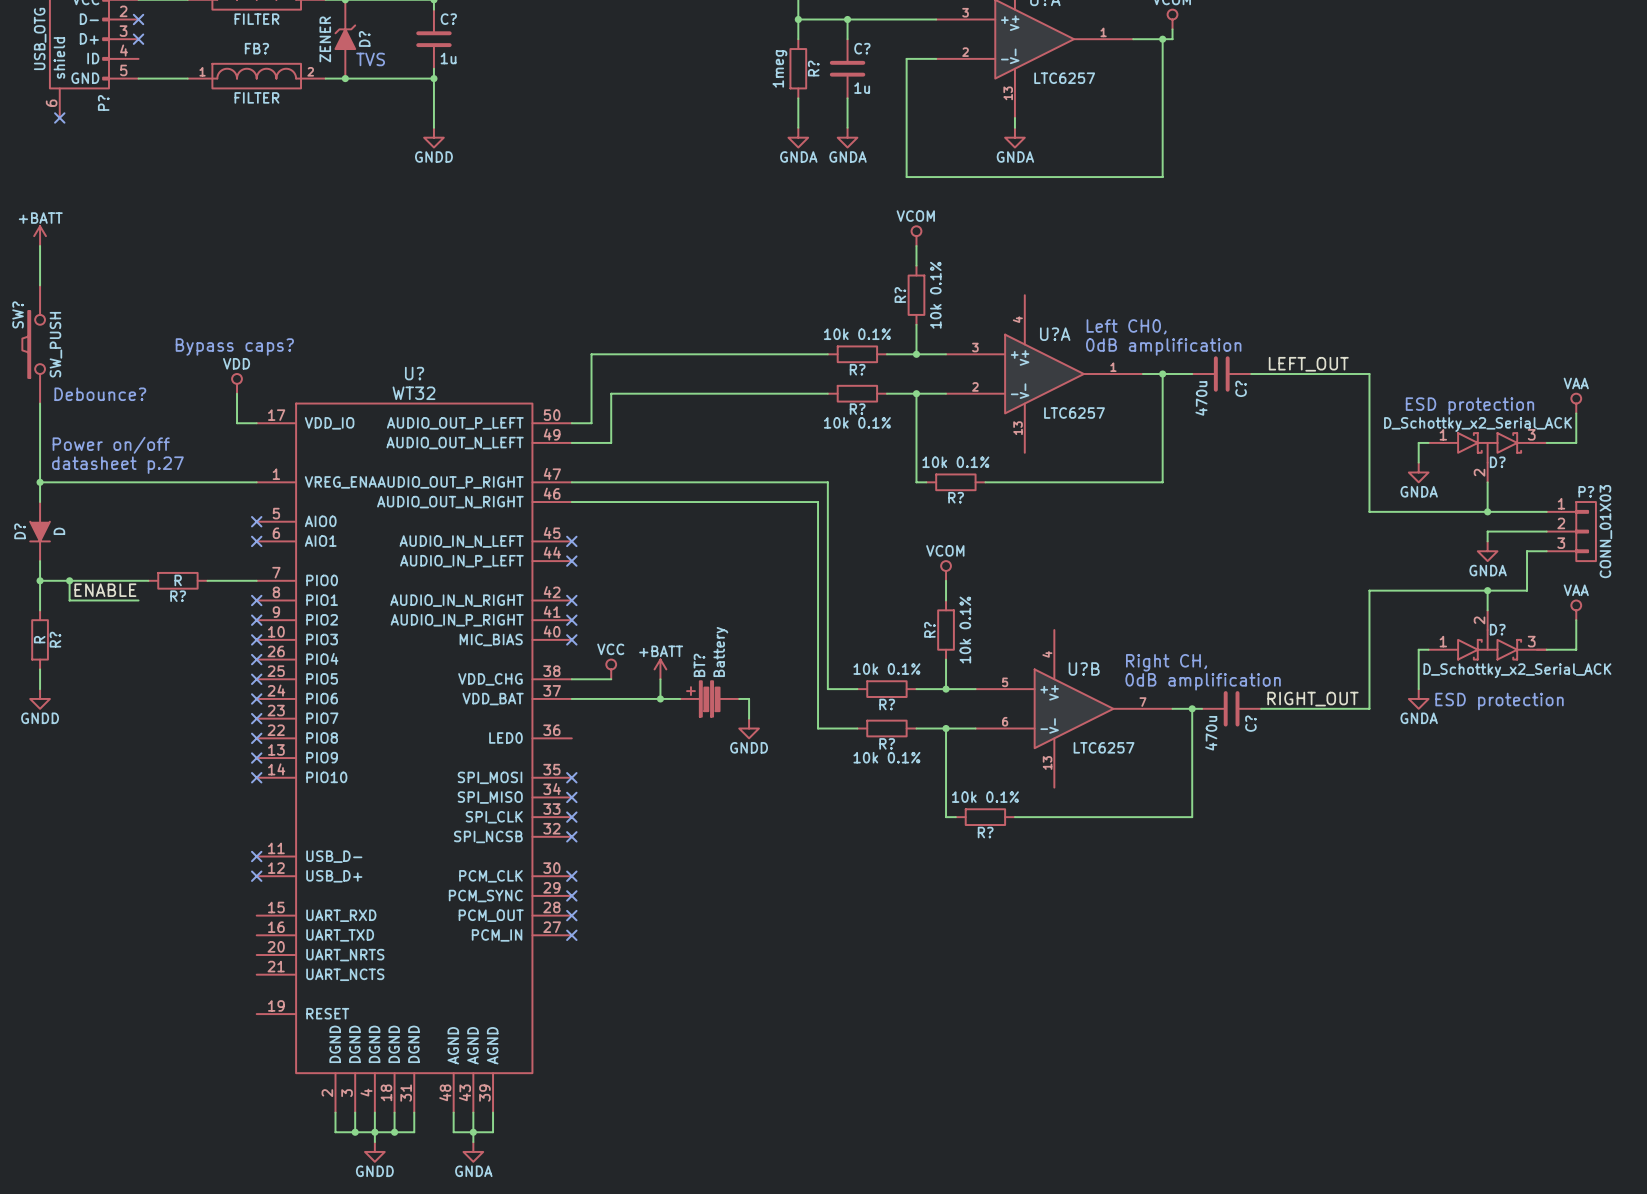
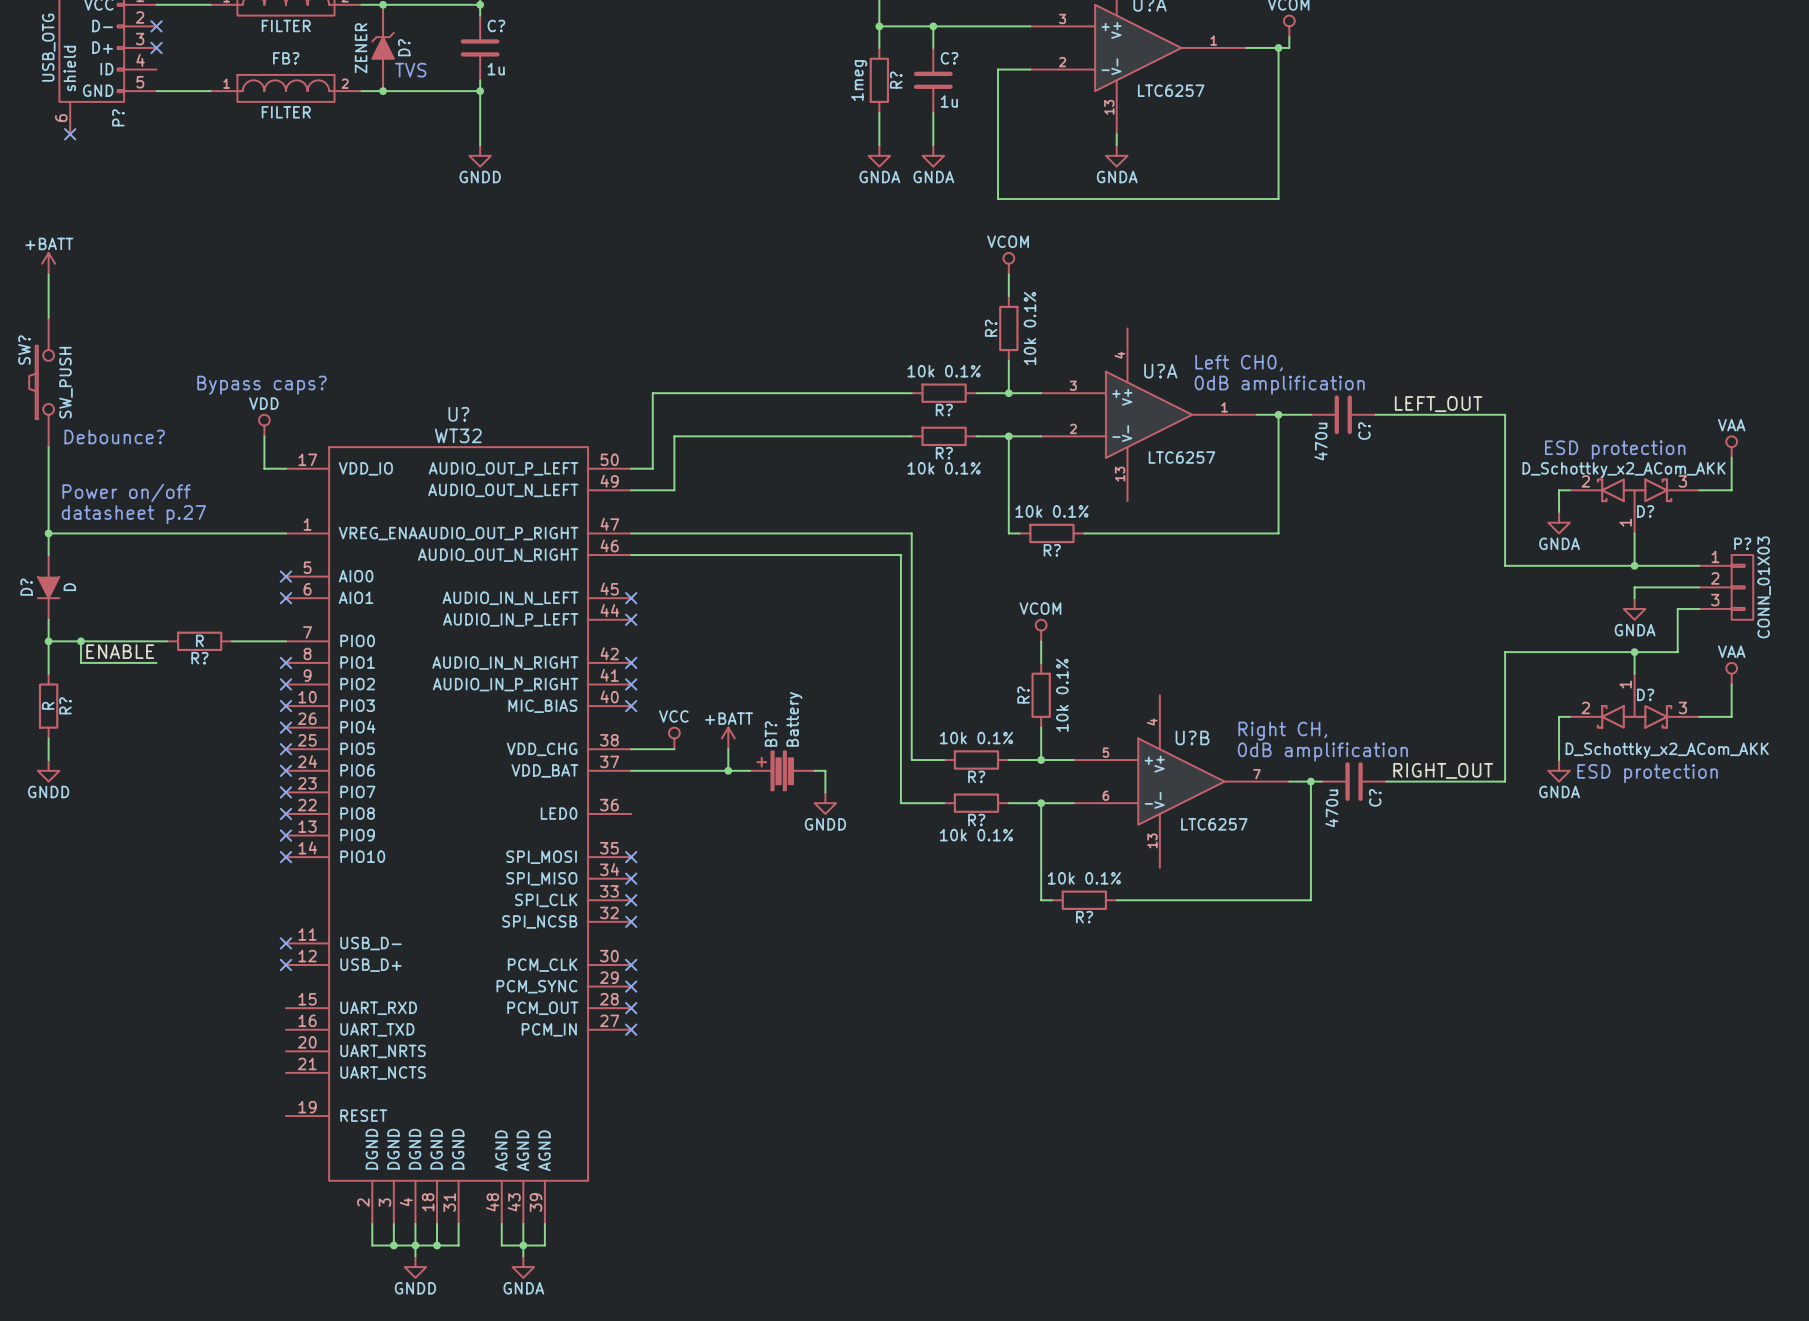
D? value: D_Schottky_x2_Serial_ACK (1478, 424) -> D_Schottky_x2_ACom_AKK (1624, 470)
D? symbol: [1428, 432, 1547, 483] -> [1569, 478, 1700, 534]
D? symbol: [1428, 610, 1547, 661] -> [1569, 673, 1700, 729]
D? value: D_Schottky_x2_Serial_ACK (1517, 670) -> D_Schottky_x2_ACom_AKK (1667, 750)

